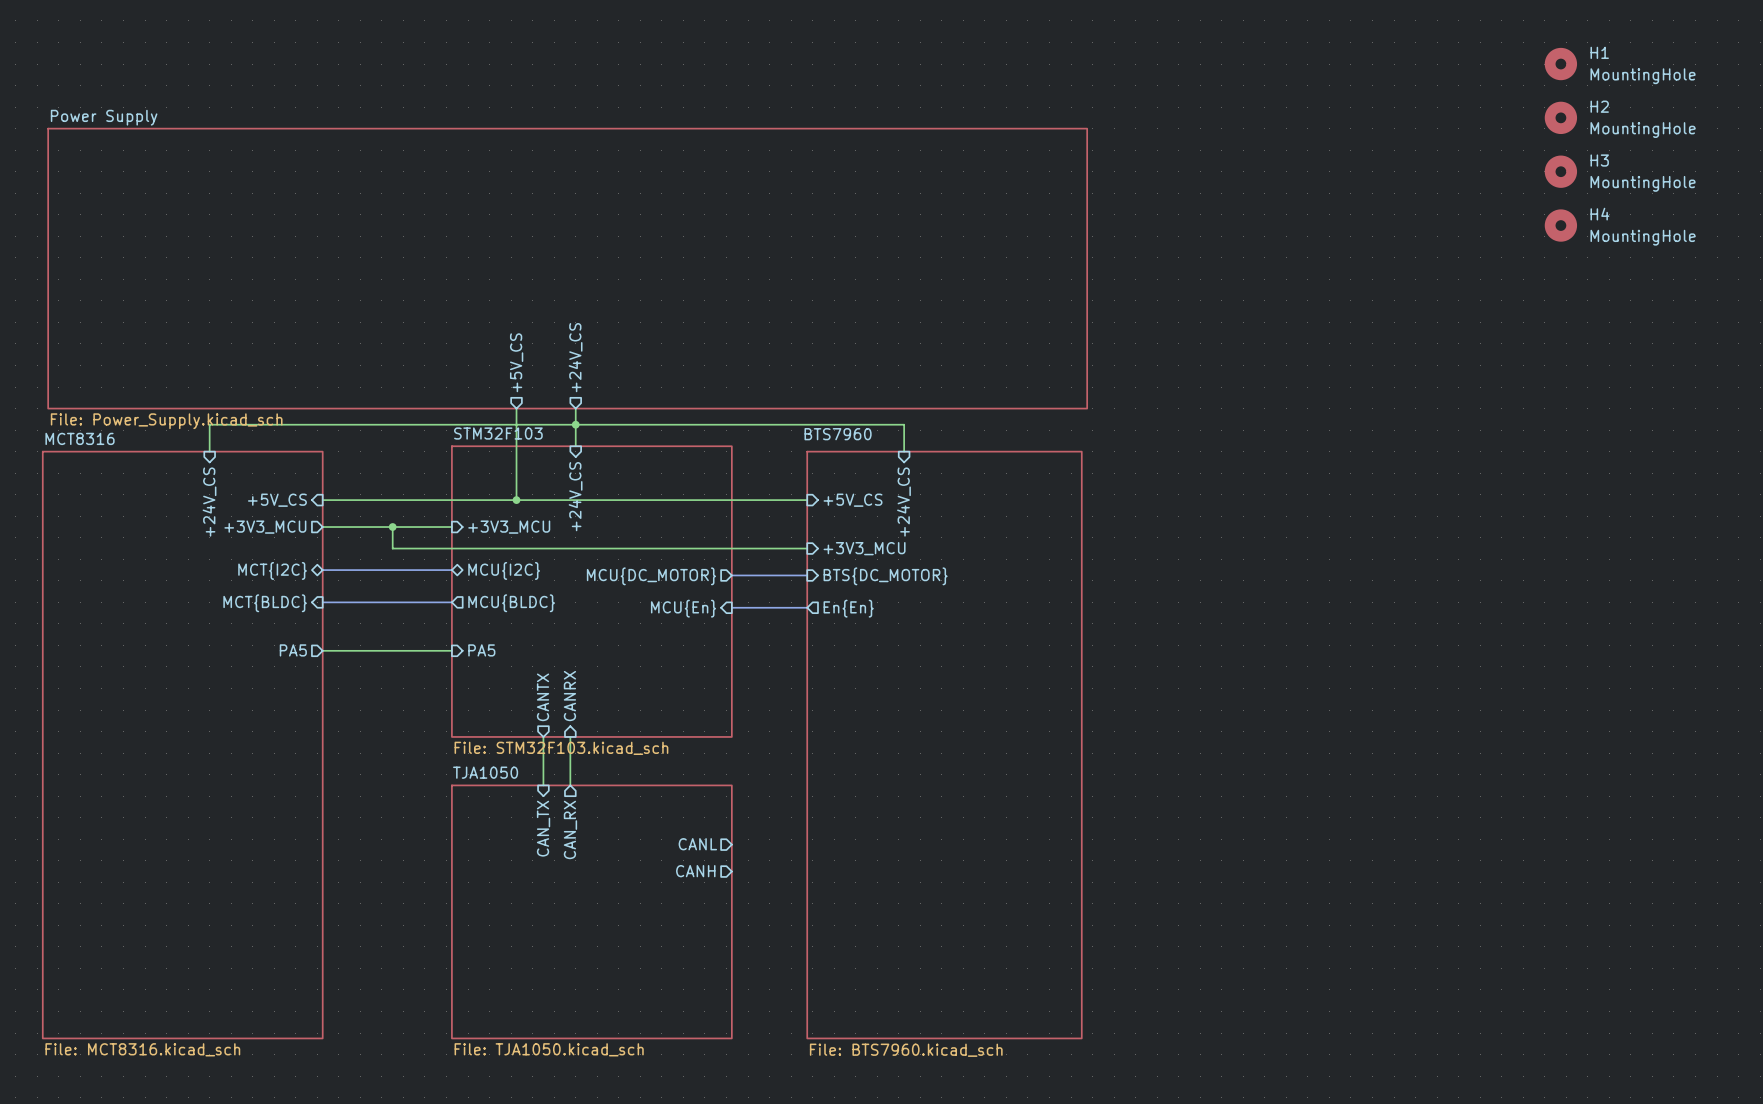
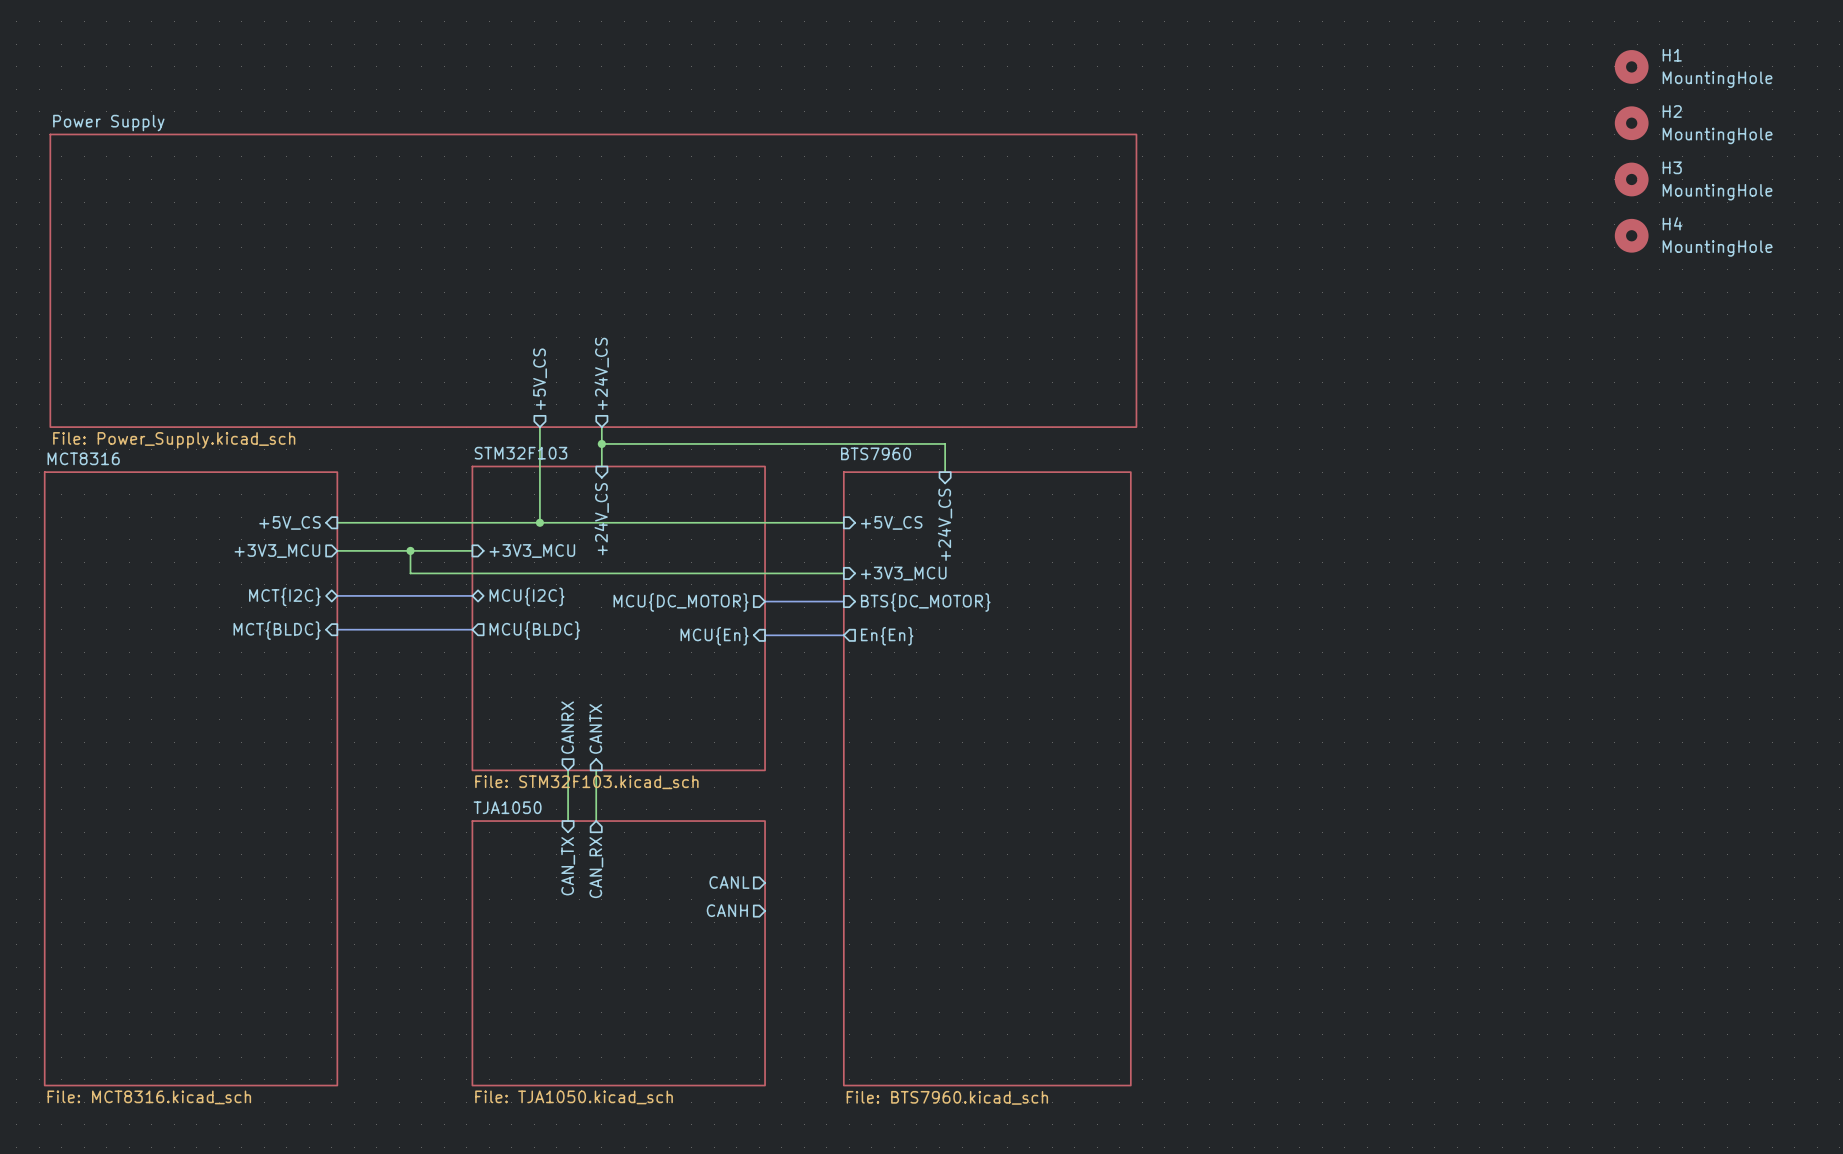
wire: (575, 424) (209, 424) (209, 451) -> none
sheet pin: +24V_CS (209, 502) -> none
sheet pin: PA5 (293, 650) -> none
wire: (322, 650) (451, 650) -> none
sheet pin: PA5 (481, 650) -> none
sheet pin: CANRX (569, 696) -> CANTX (595, 728)
sheet pin: CANTX (543, 697) -> CANRX (567, 727)

